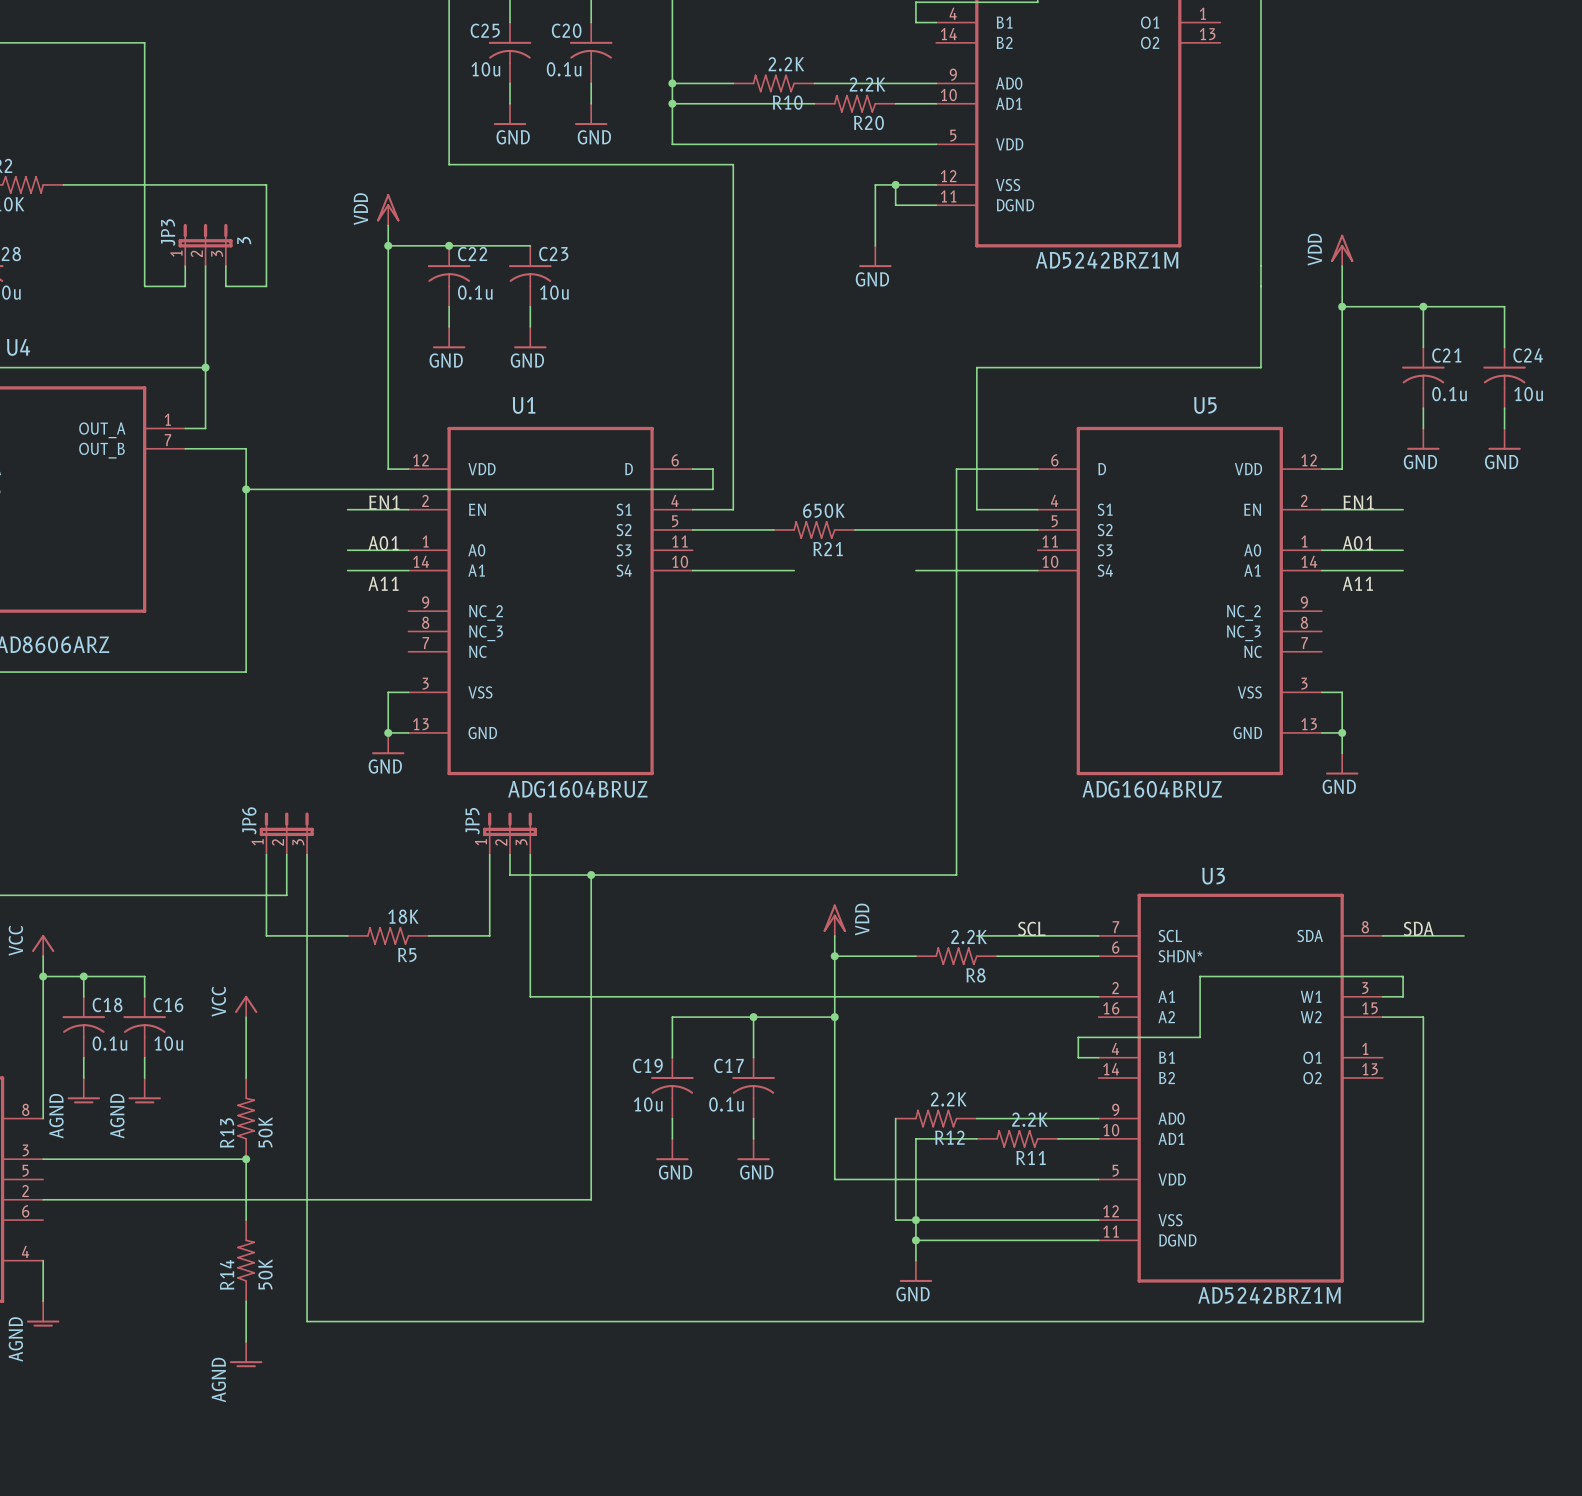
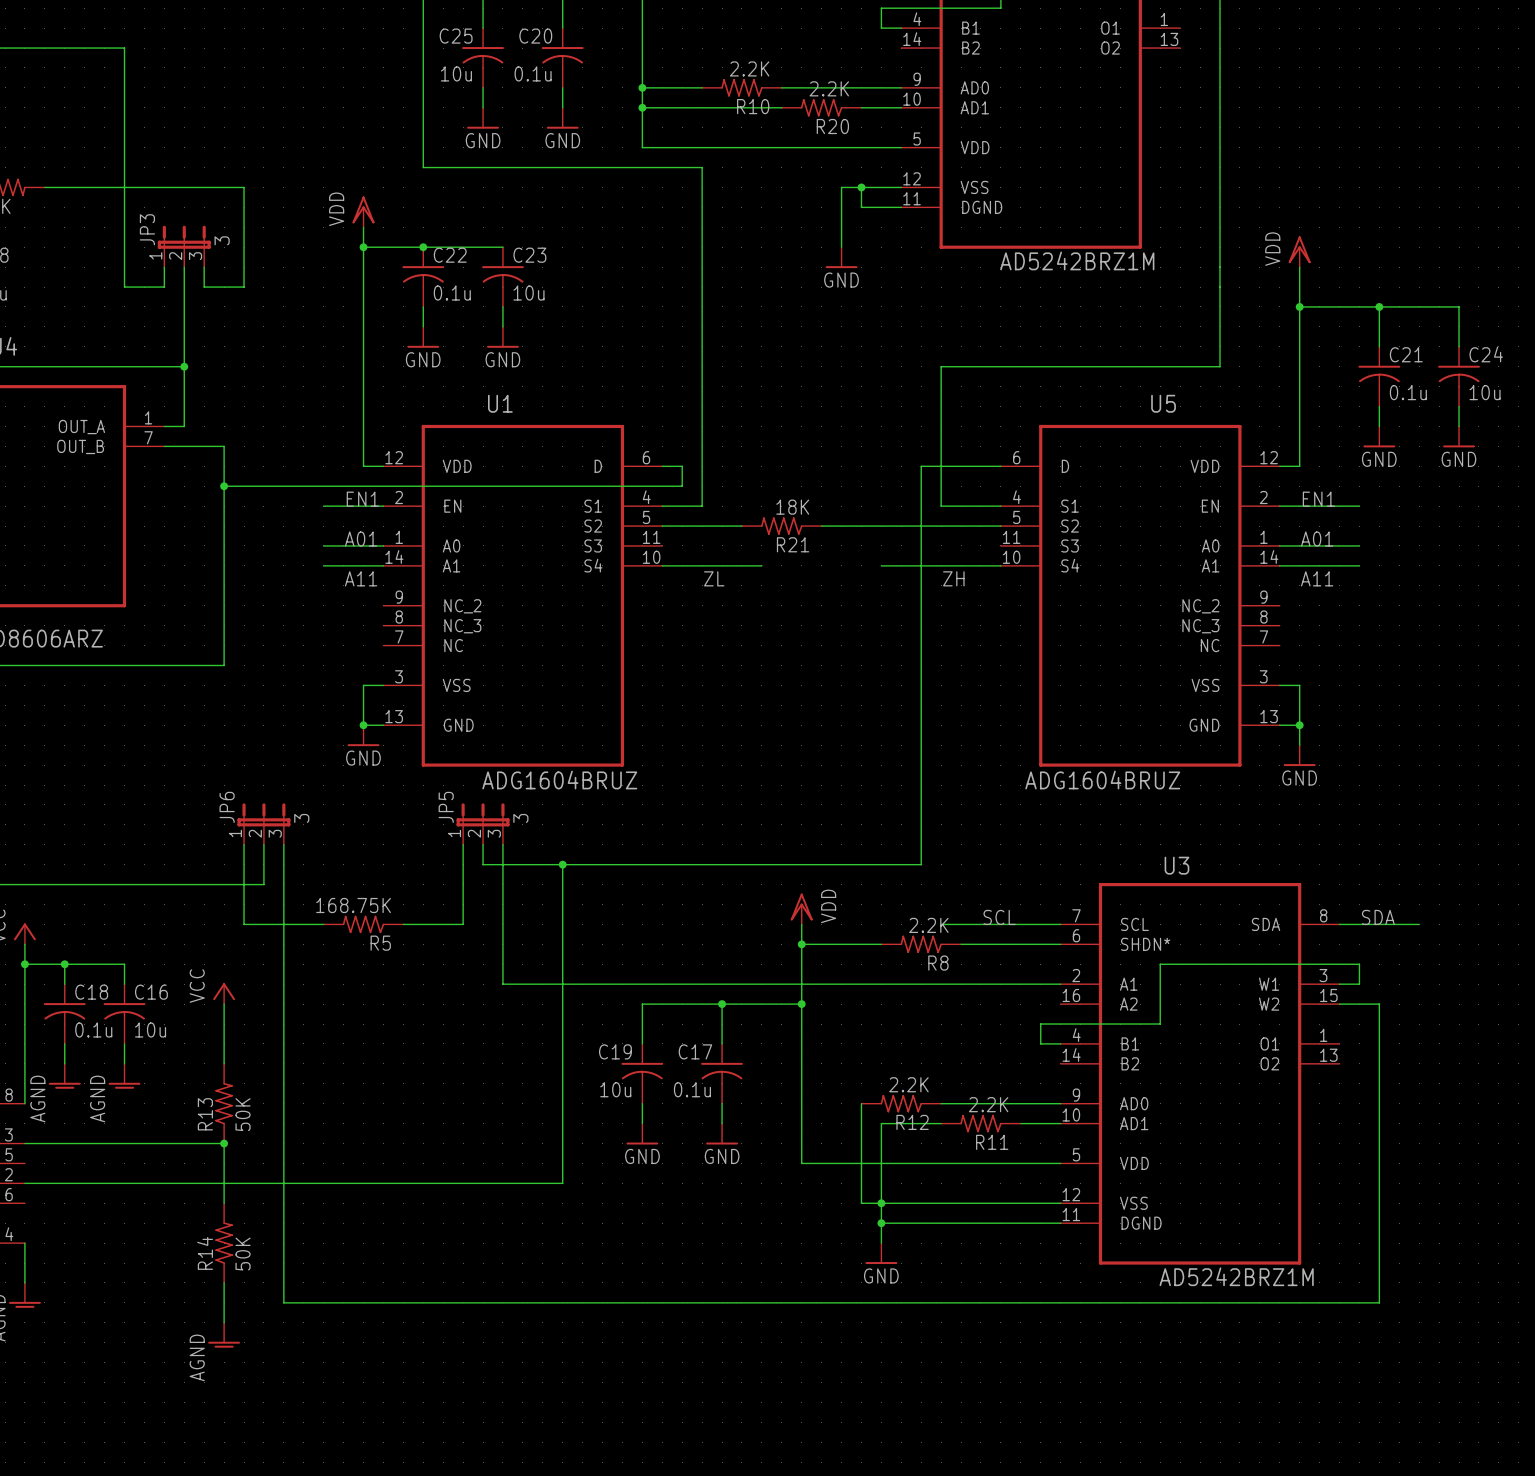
R21 value: 650K (823, 510) -> 18K (792, 507)
label: none -> ZL (714, 578)
label: none -> ZH (953, 578)
JP6 value: none -> 3 (301, 818)
JP5 value: none -> 3 (520, 818)
R5 value: 18K (403, 916) -> 168.75K (353, 905)

